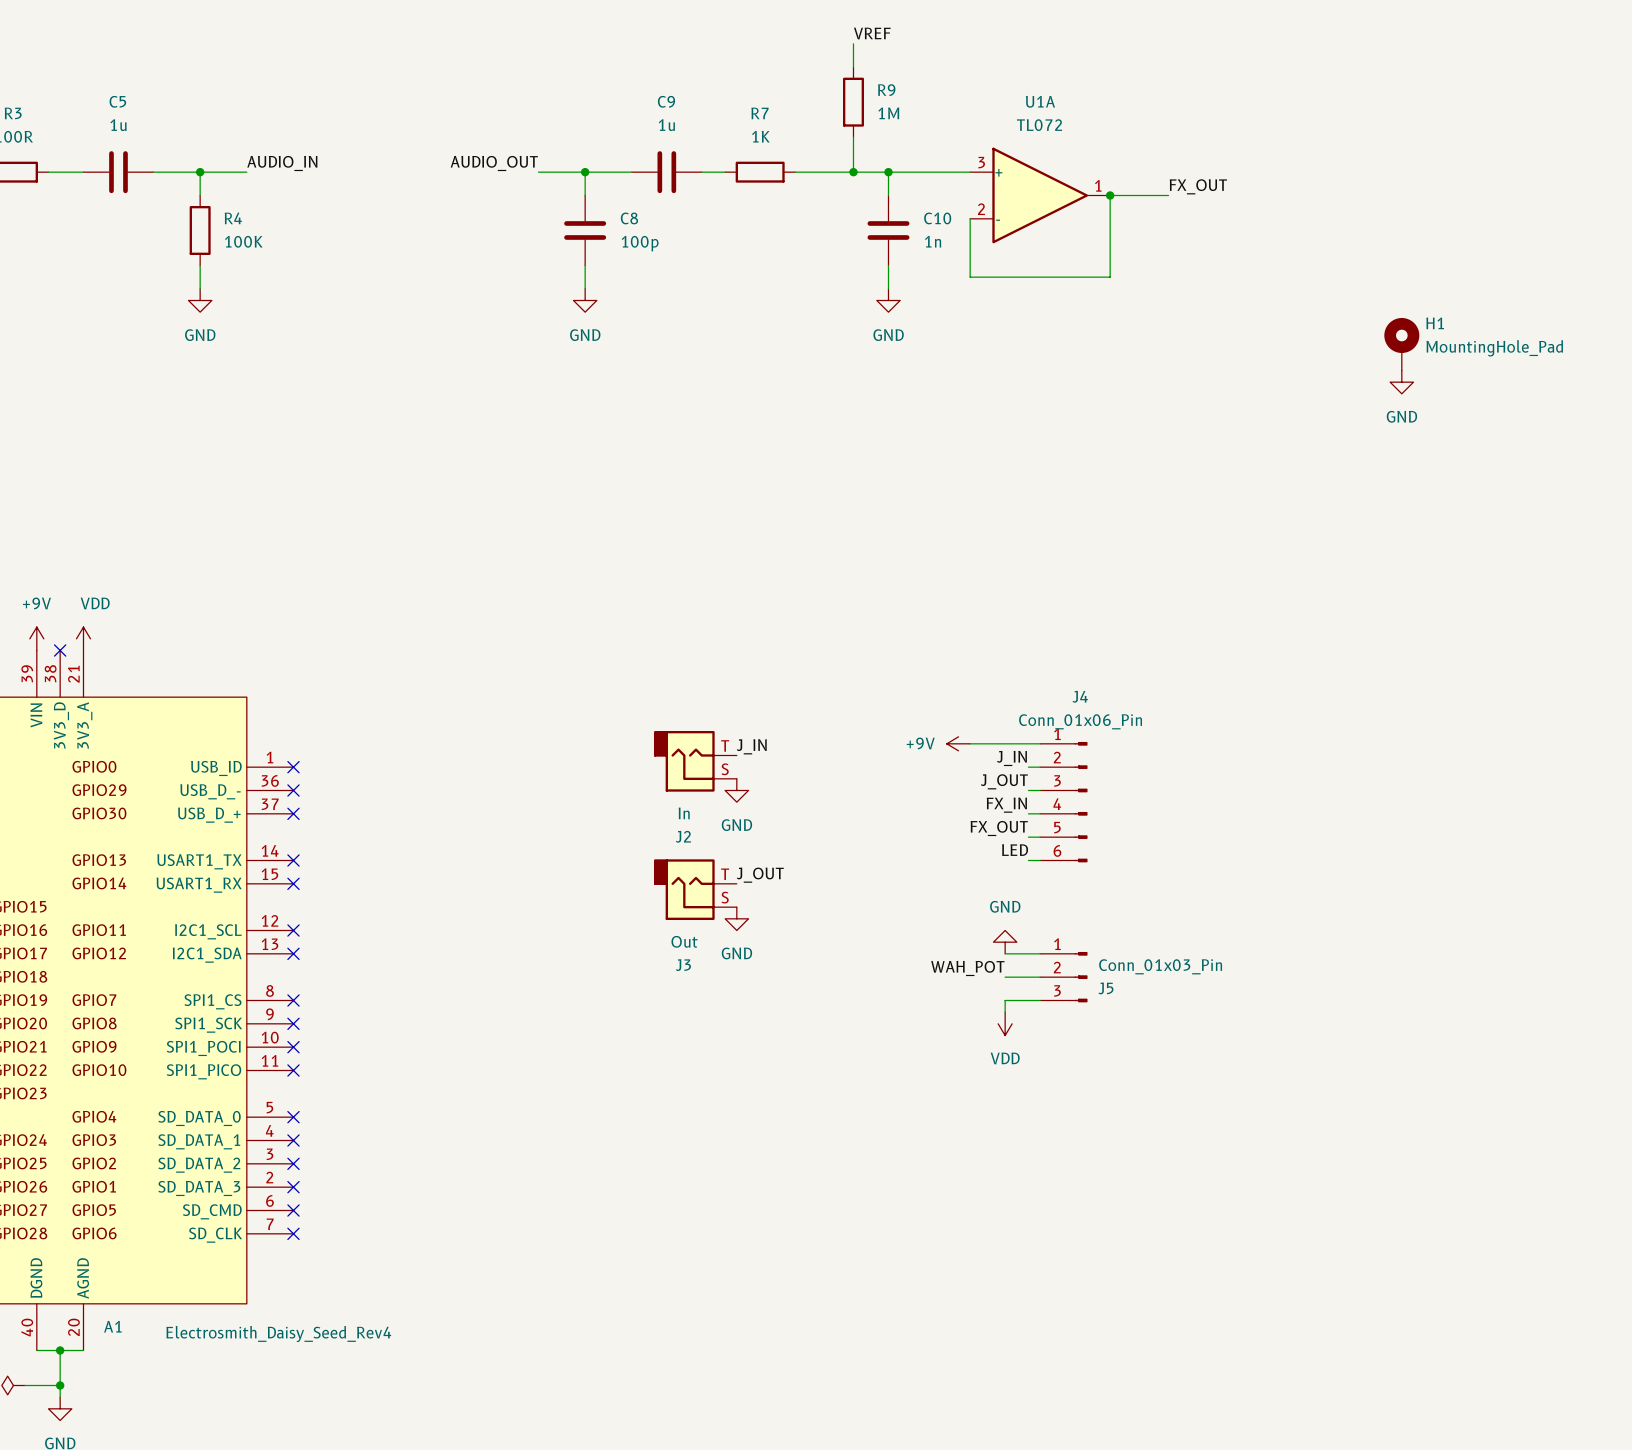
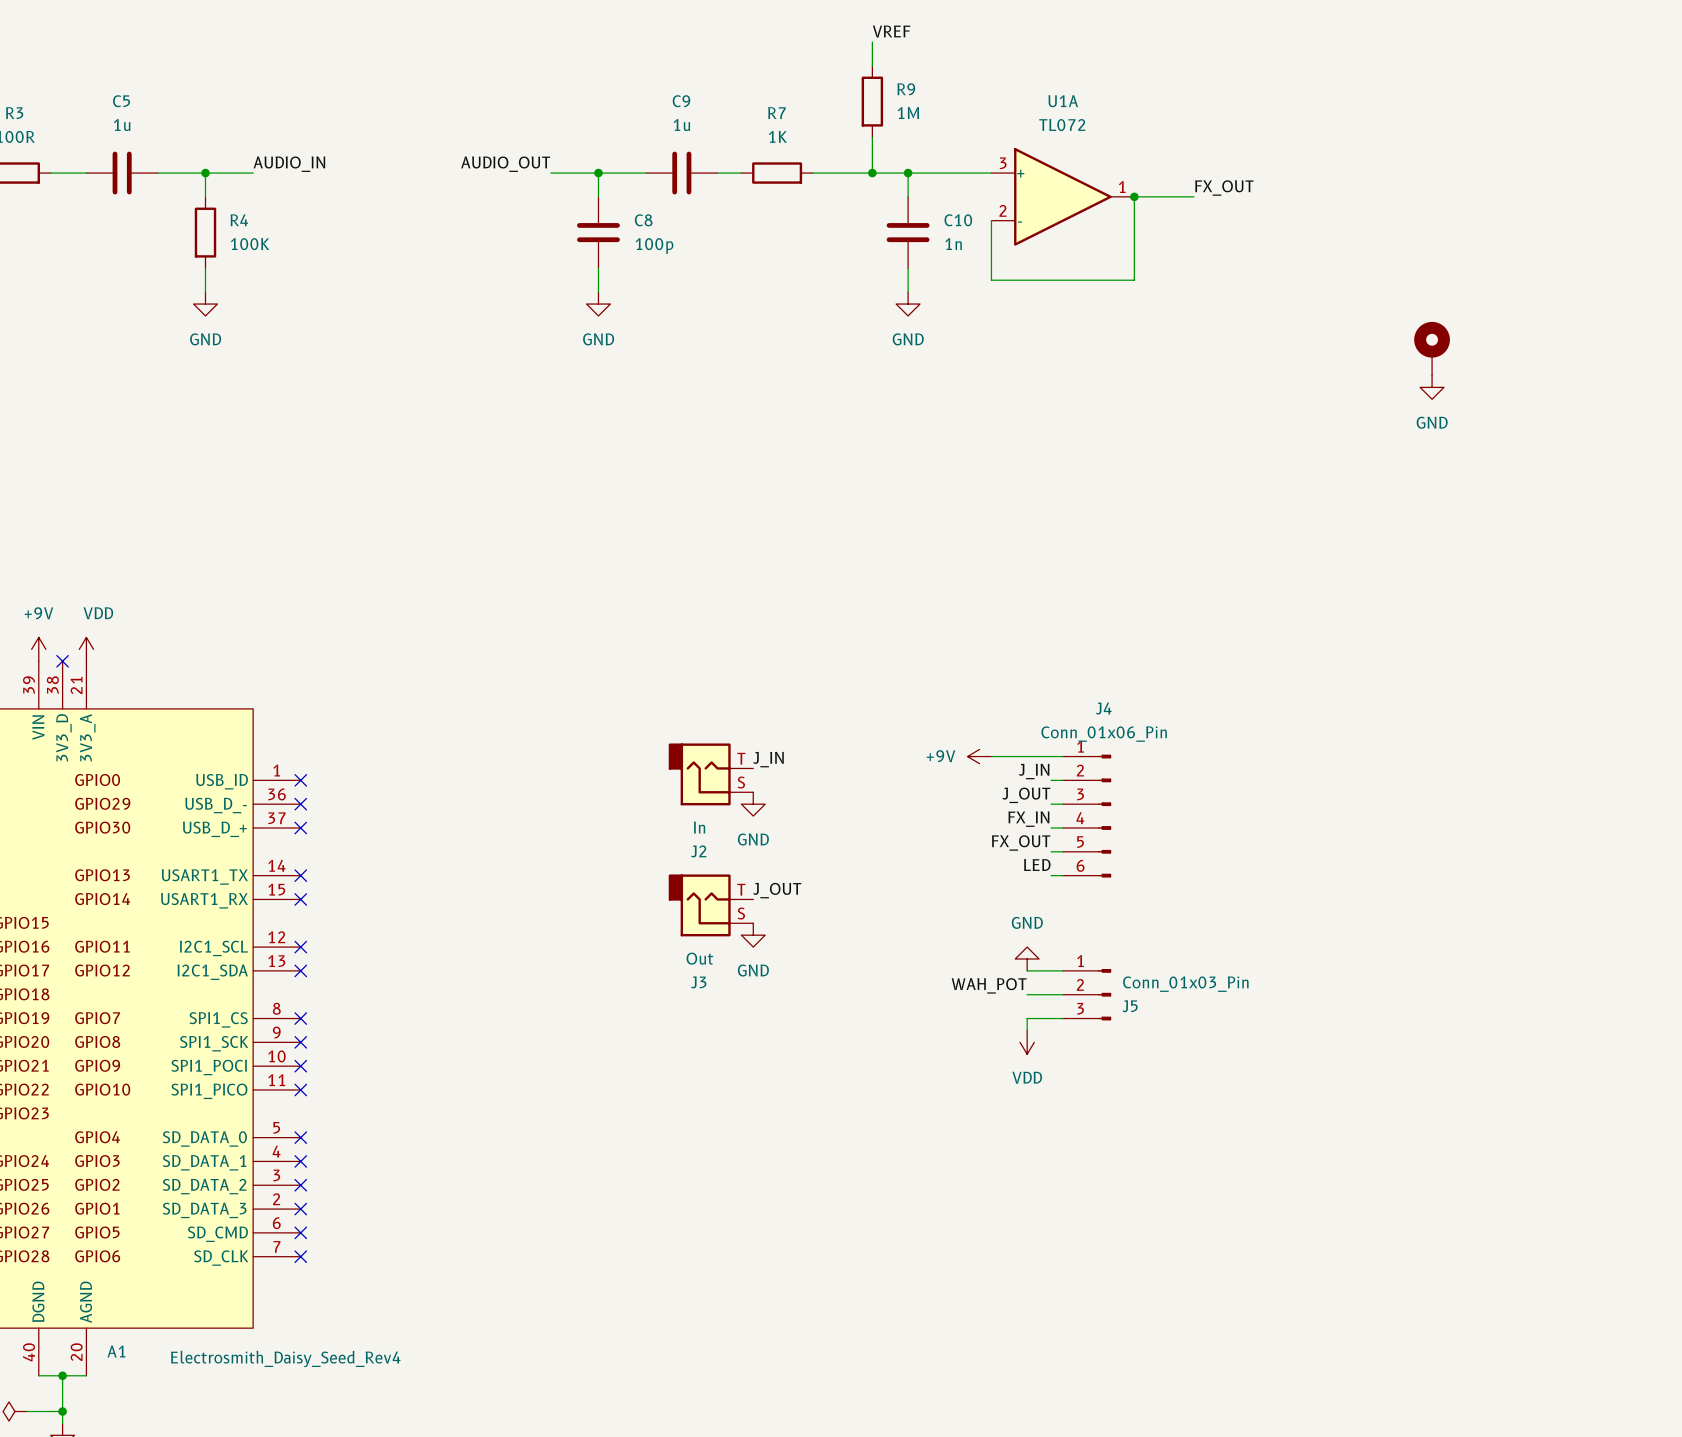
H1 name: H1 (1435, 323) -> none
H1 value: MountingHole_Pad (1494, 348) -> none

